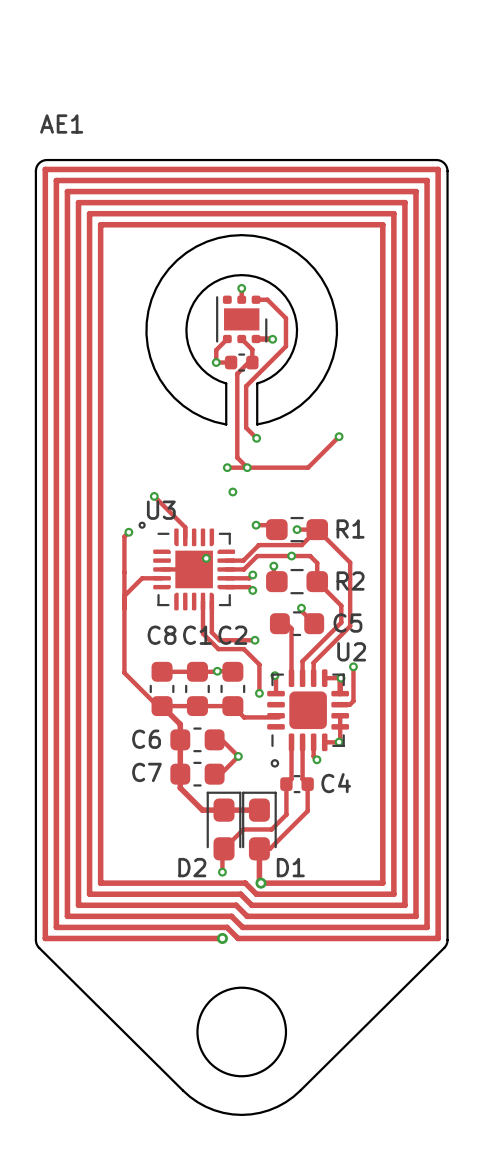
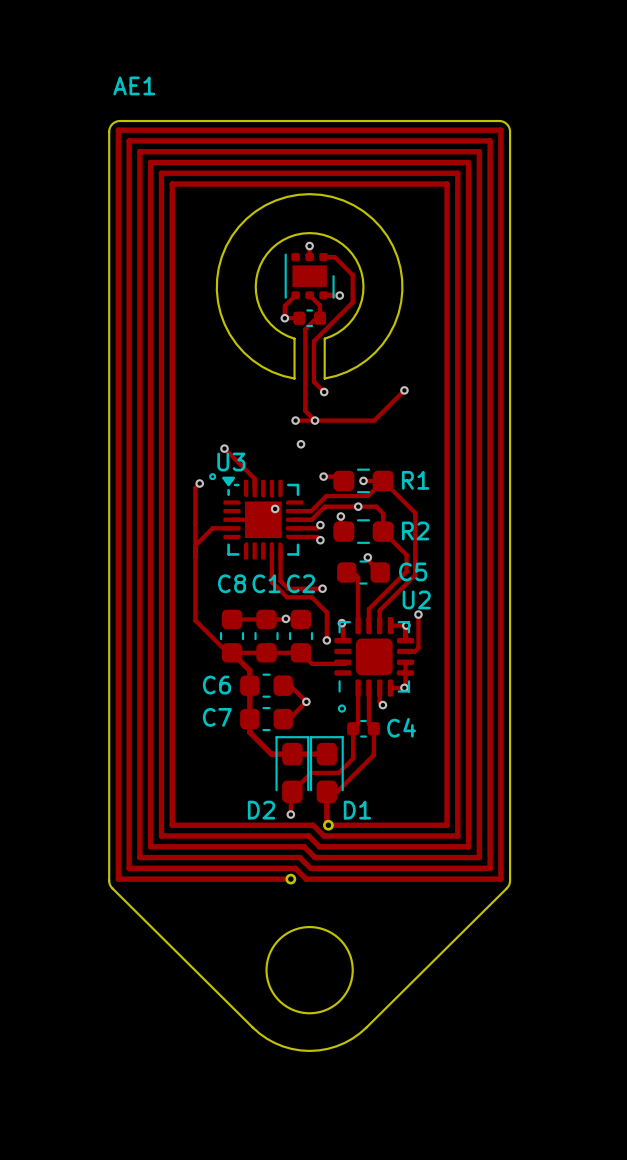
U3 footprint: [153, 528, 236, 611] -> [222, 476, 304, 560]

